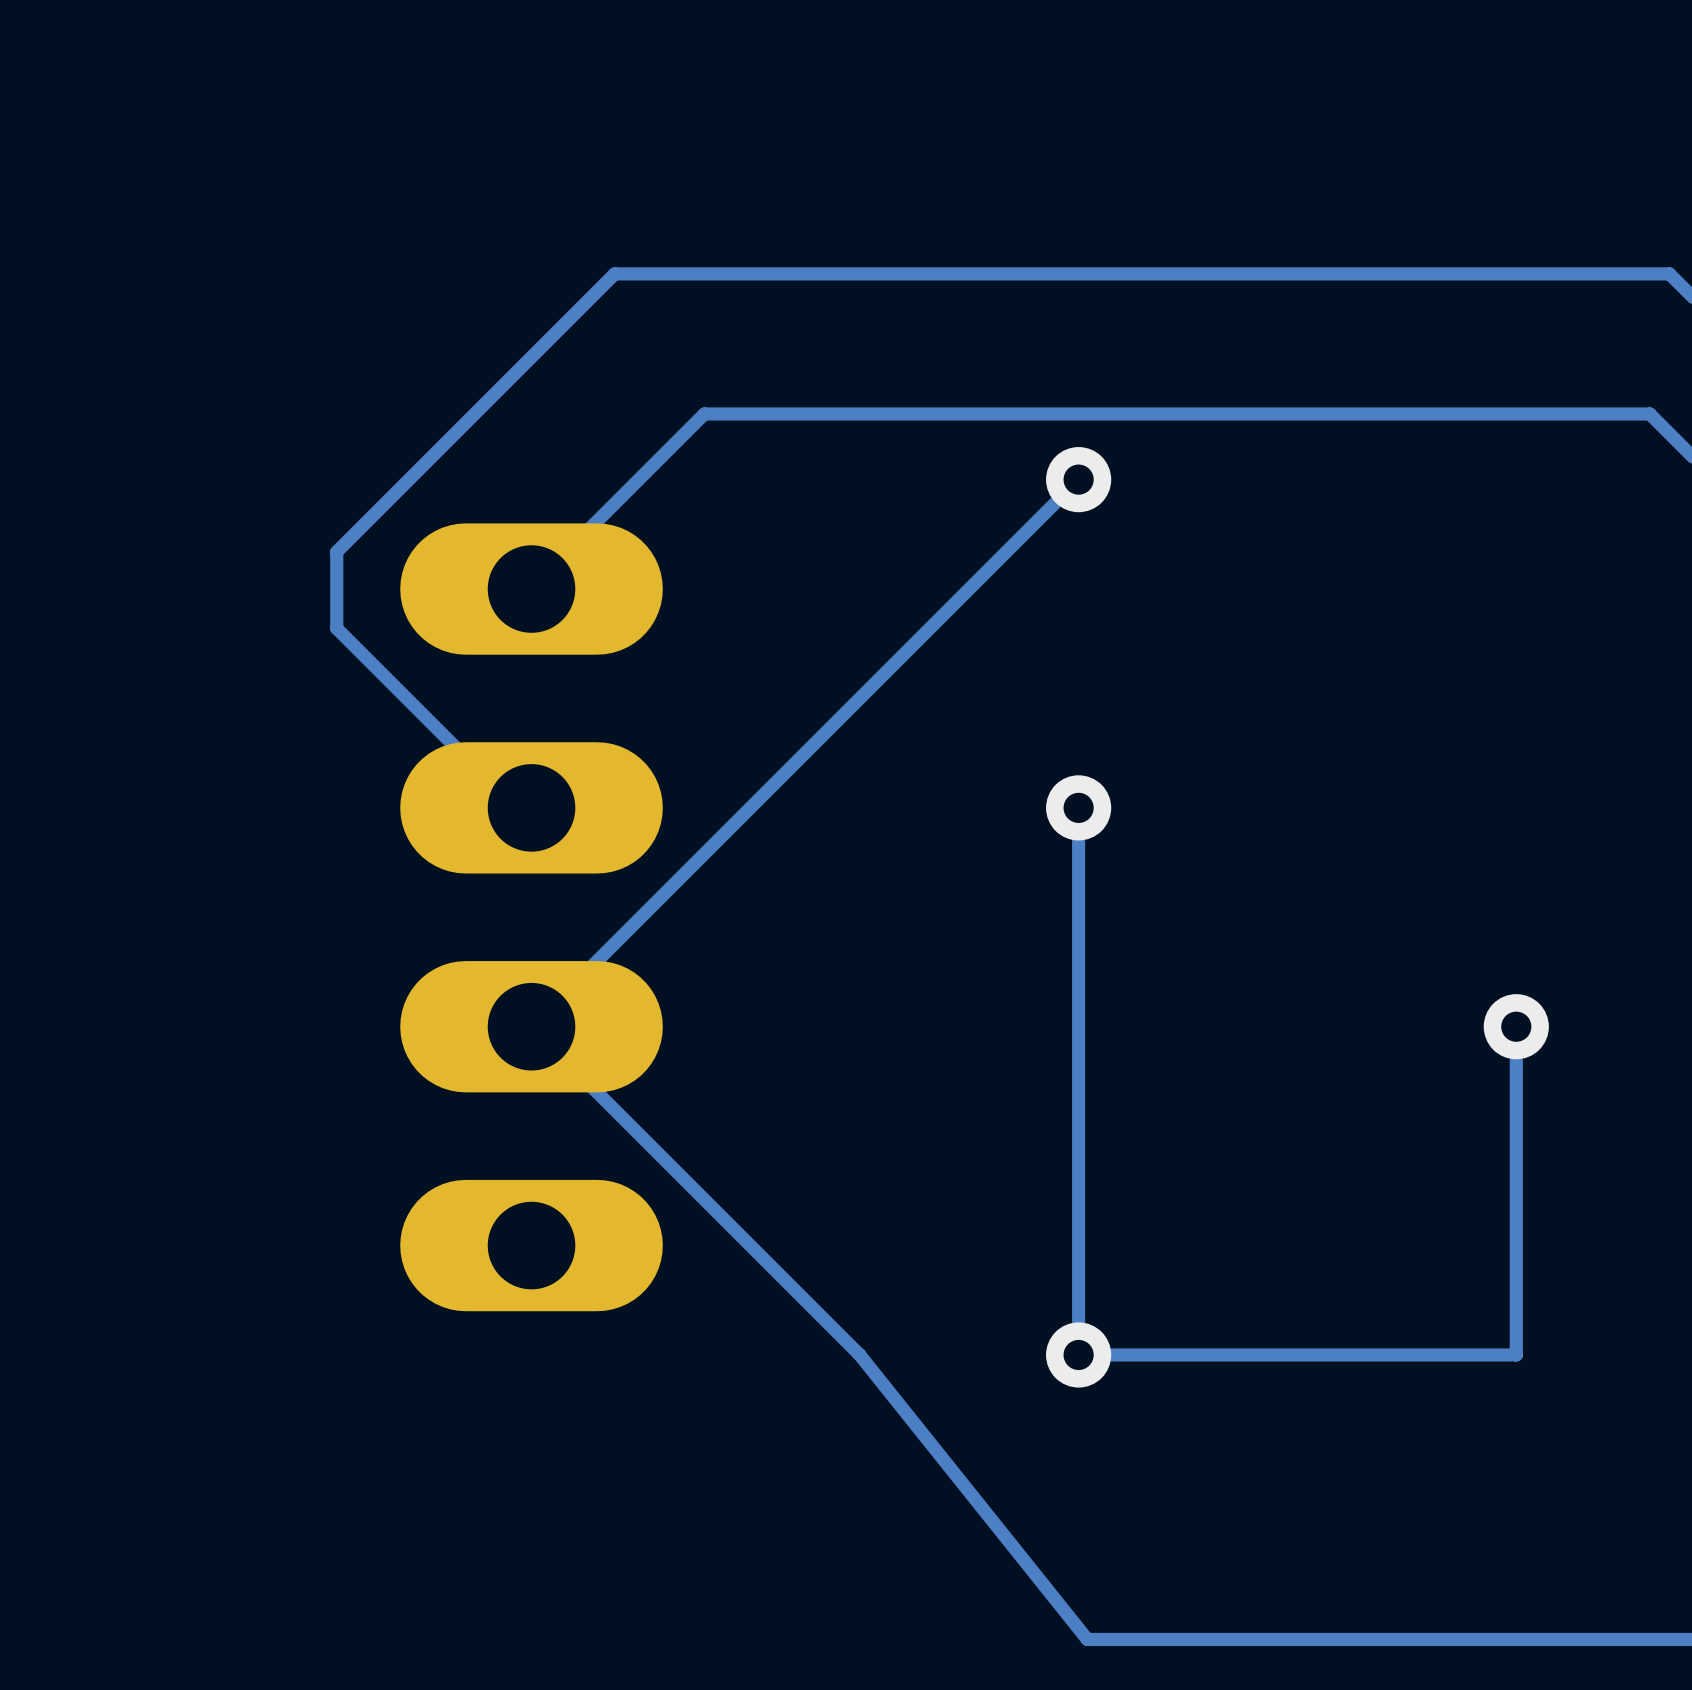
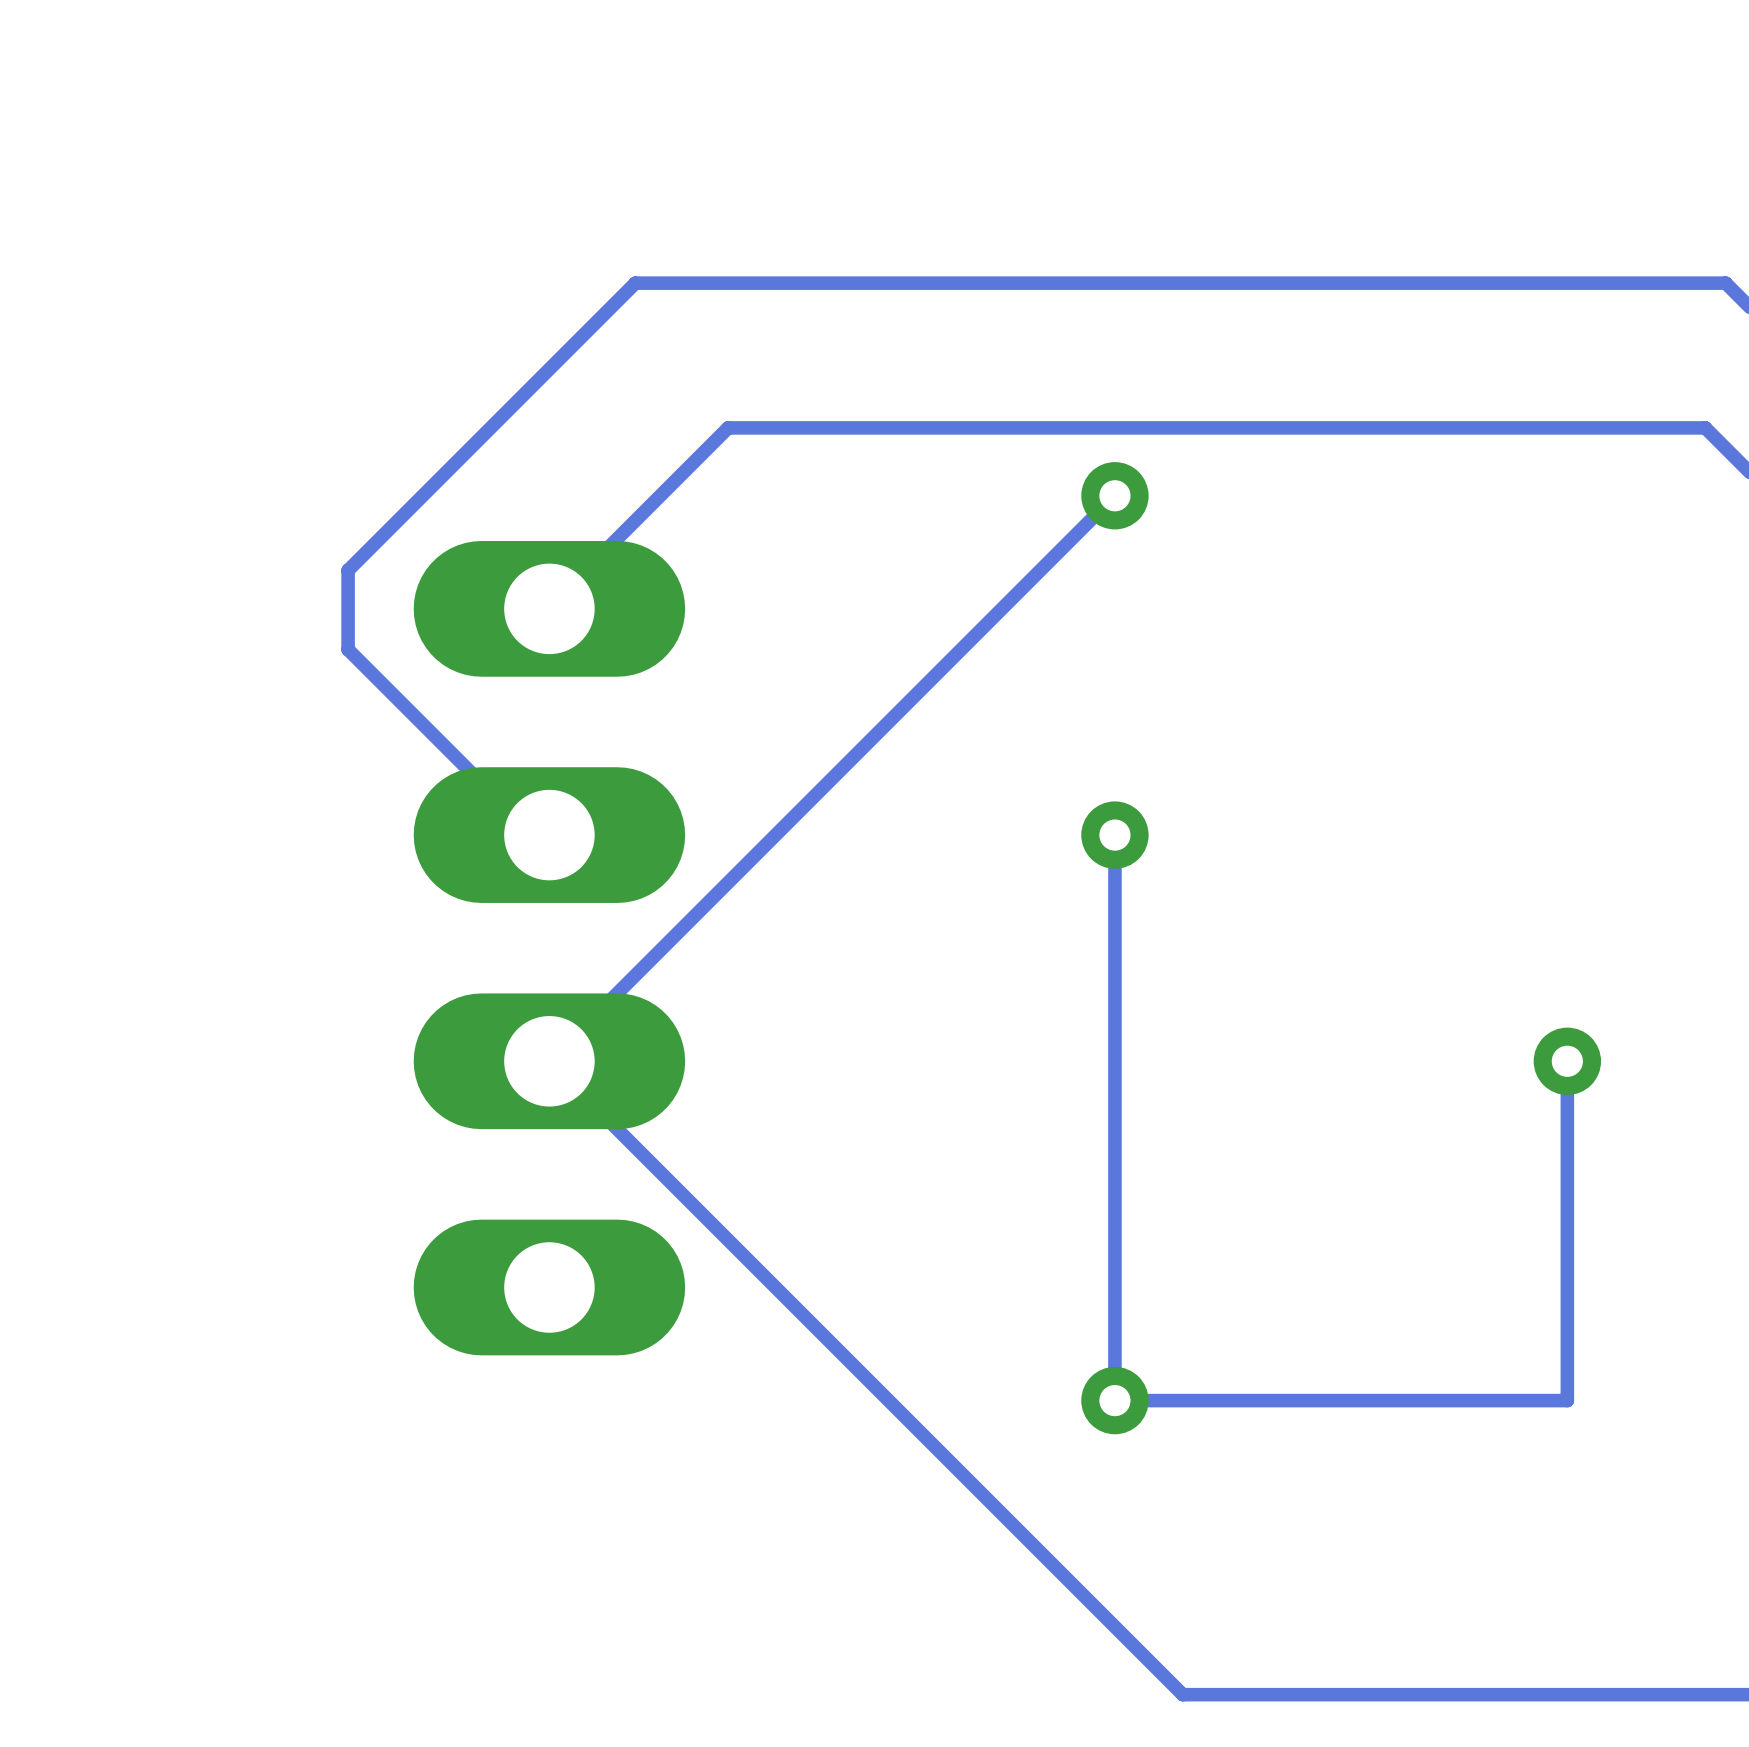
track: (859, 1354) (1087, 1639) (1144, 1639) -> (888, 1400) (1182, 1694)

